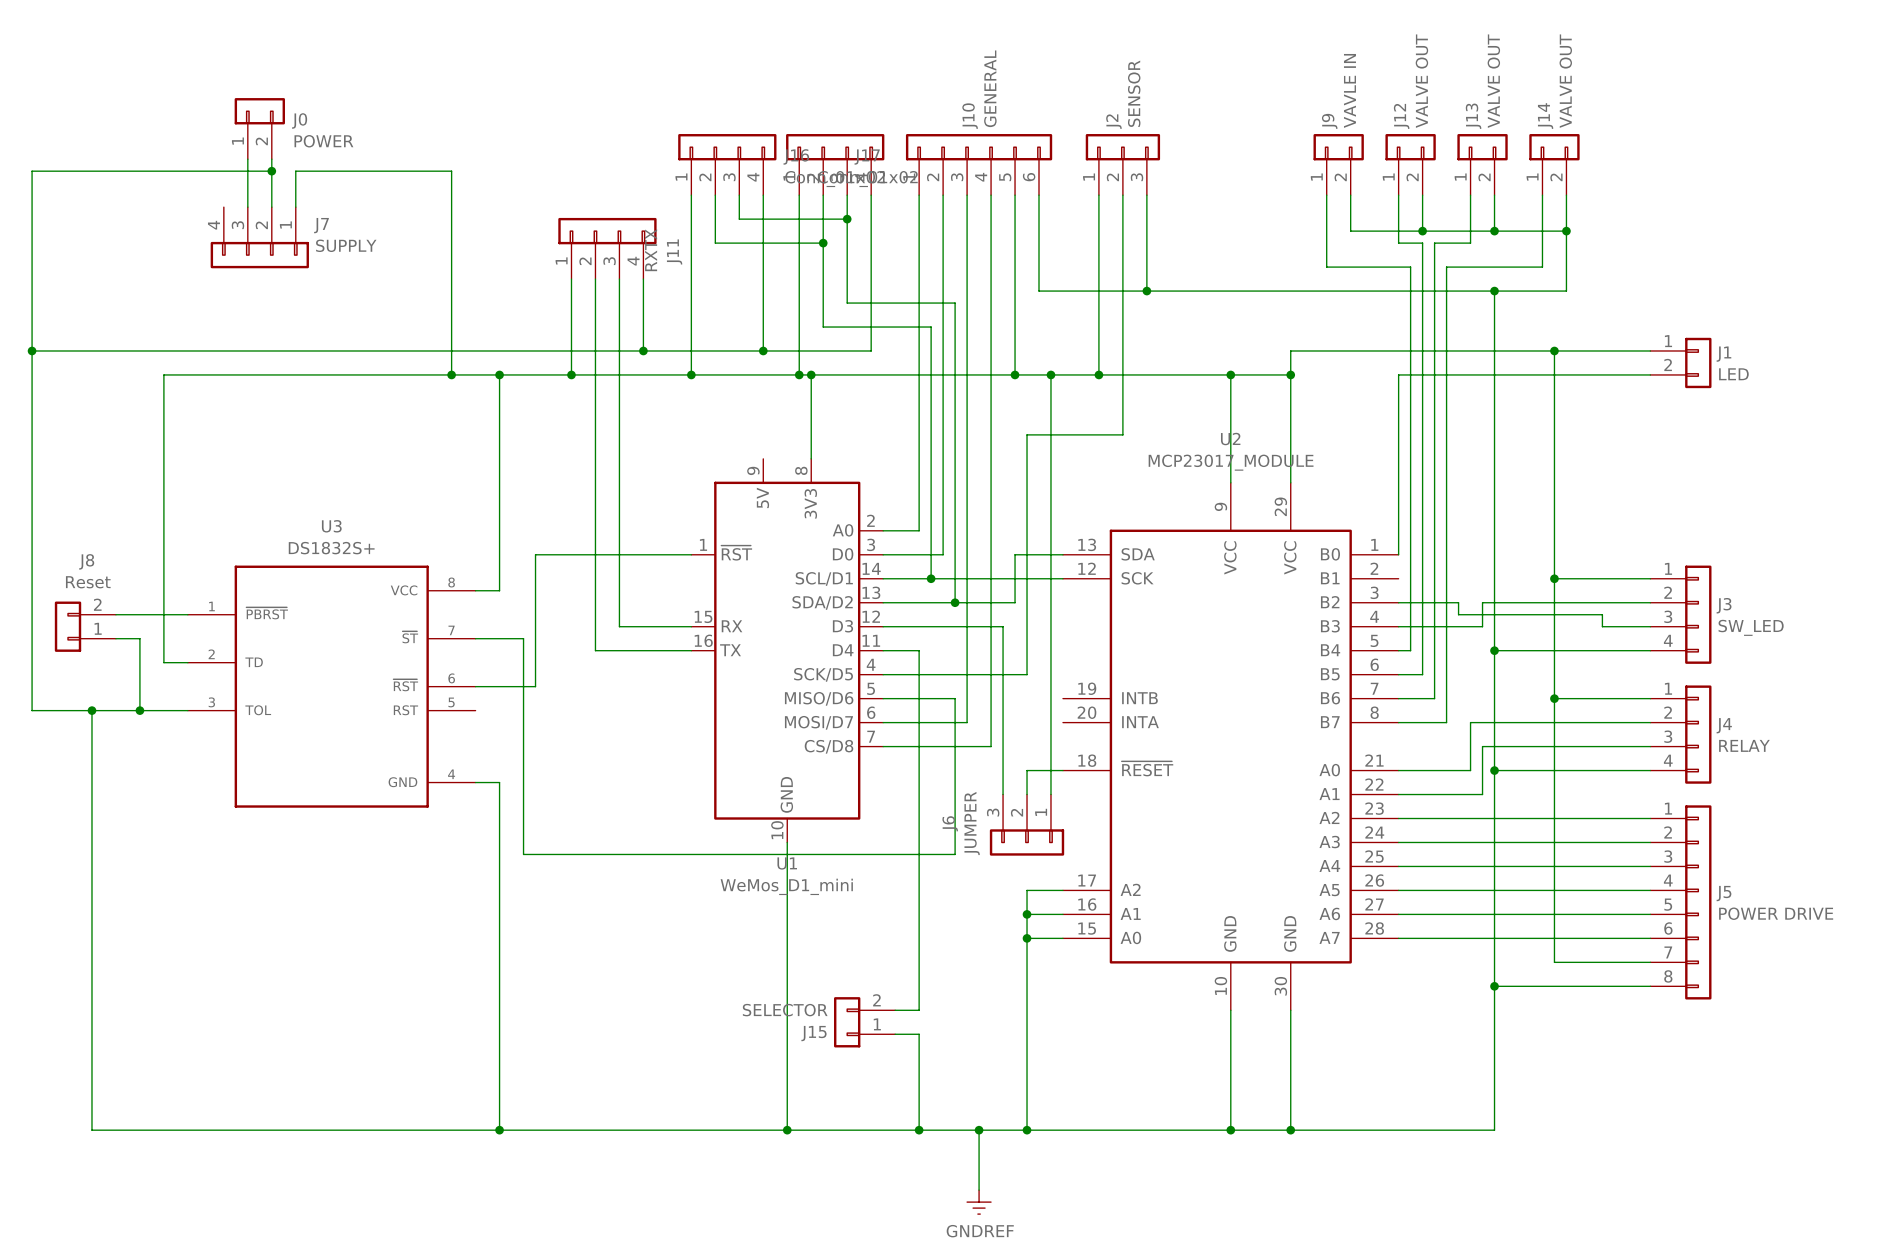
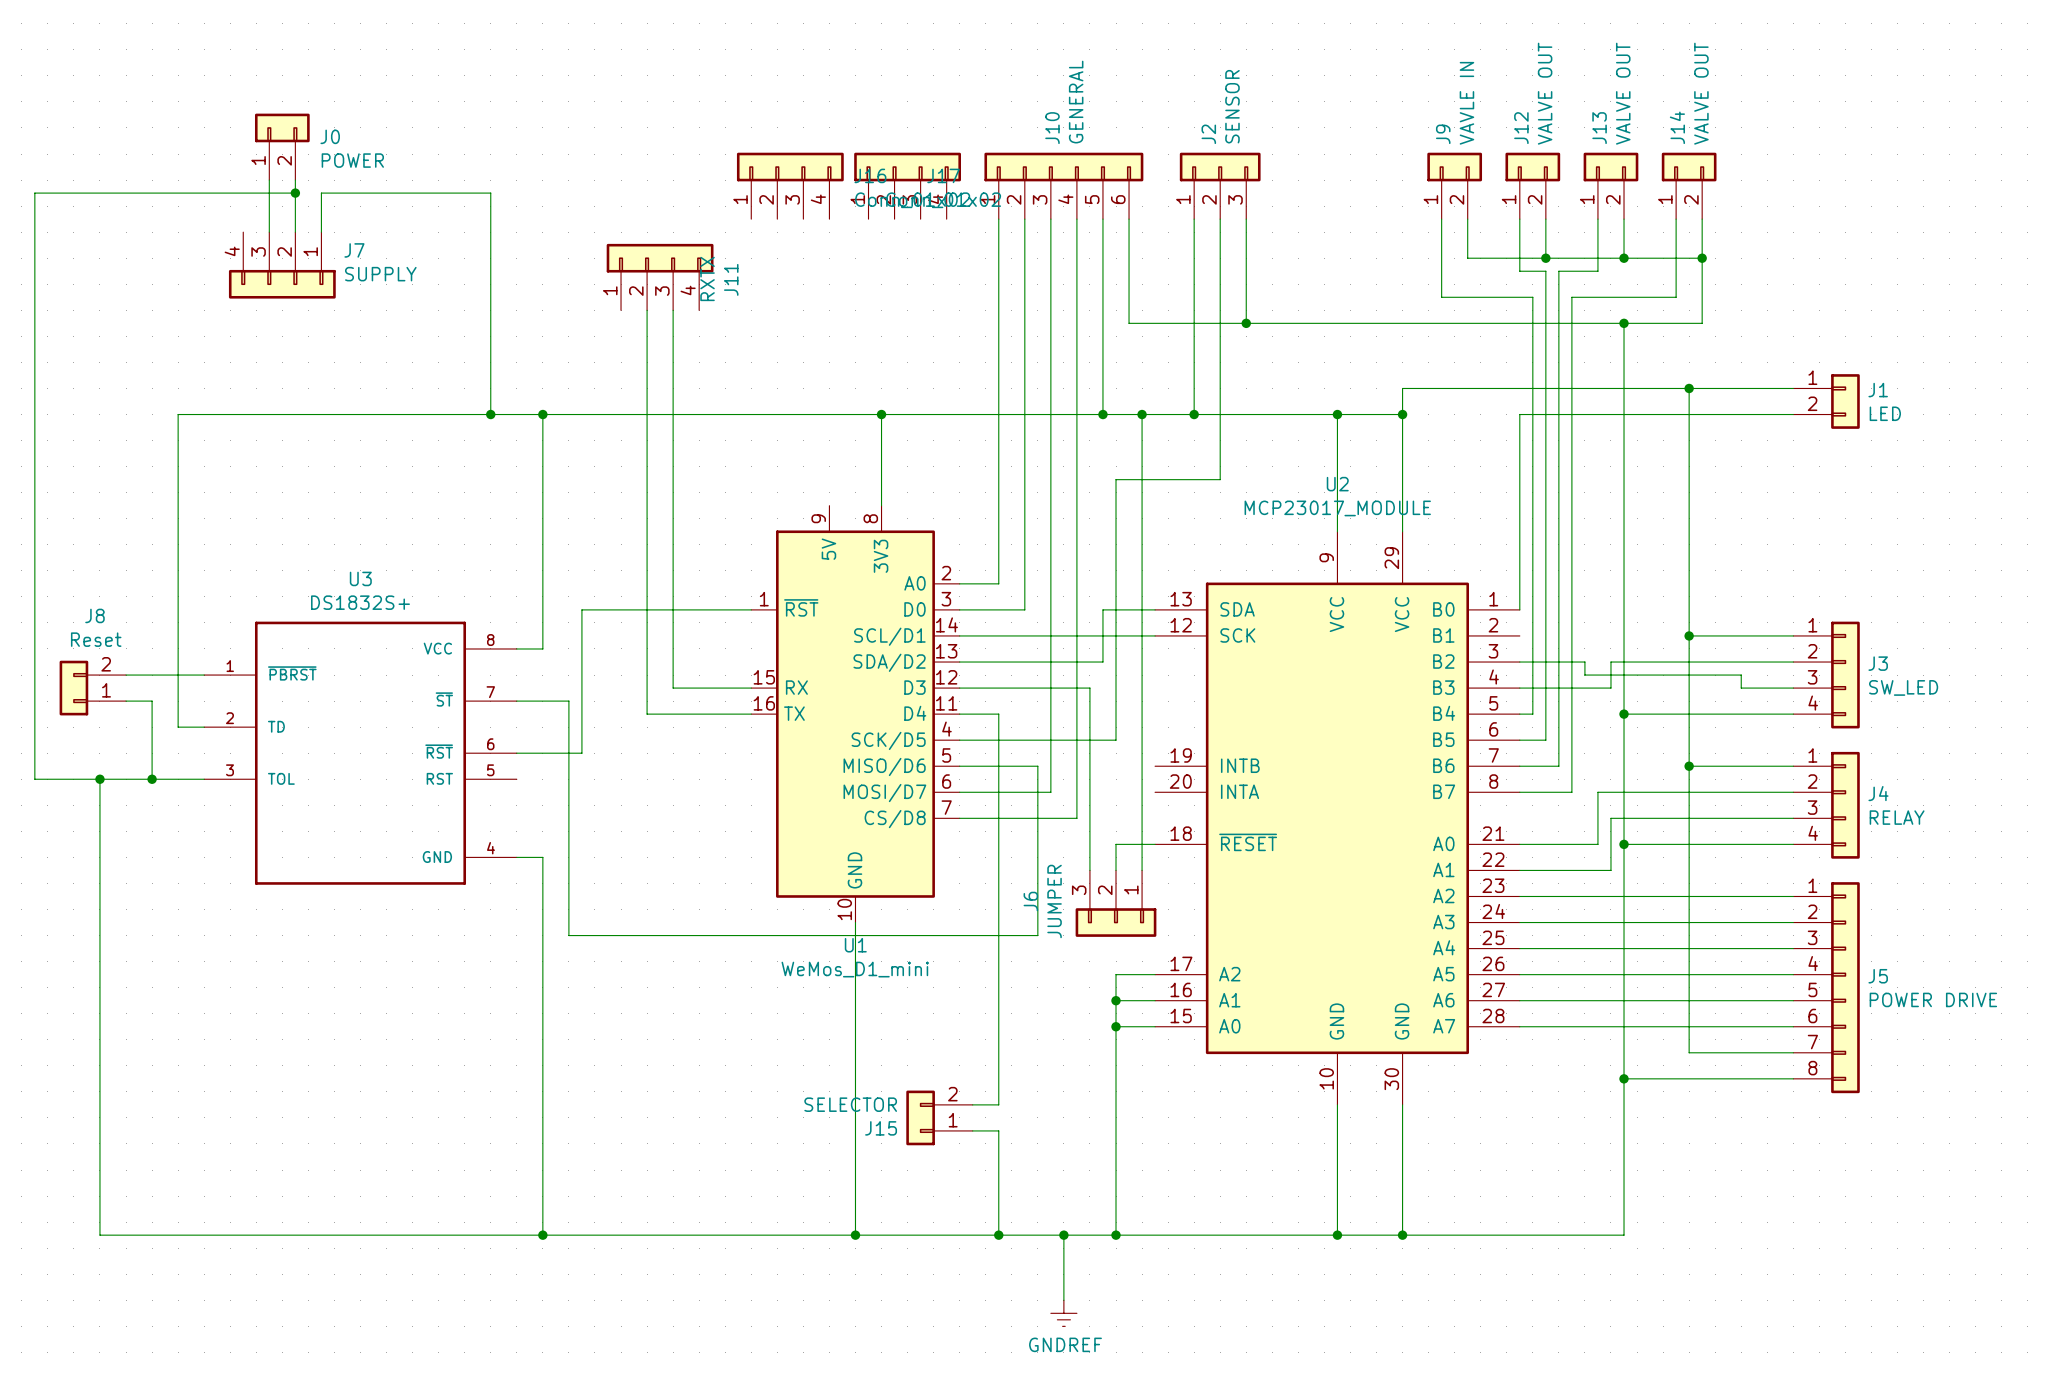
wire: (691, 195) (691, 374) -> none
wire: (715, 195) (715, 243) (823, 243) -> none
wire: (739, 195) (739, 219) (847, 219) -> none
wire: (763, 195) (763, 350) -> none
wire: (799, 195) (799, 374) -> none
wire: (823, 195) (823, 327) (931, 327) (931, 578) -> none
wire: (847, 195) (847, 303) (955, 303) (955, 602) -> none
wire: (871, 195) (871, 350) (32, 350) -> none
junction: (847, 219) -> none
junction: (823, 243) -> none
wire: (571, 279) (571, 374) -> none
wire: (643, 279) (643, 350) -> none
junction: (32, 350) -> none
junction: (643, 350) -> none
junction: (763, 350) -> none
junction: (571, 374) -> none
junction: (691, 374) -> none
junction: (799, 374) -> none
junction: (931, 578) -> none
junction: (955, 602) -> none

